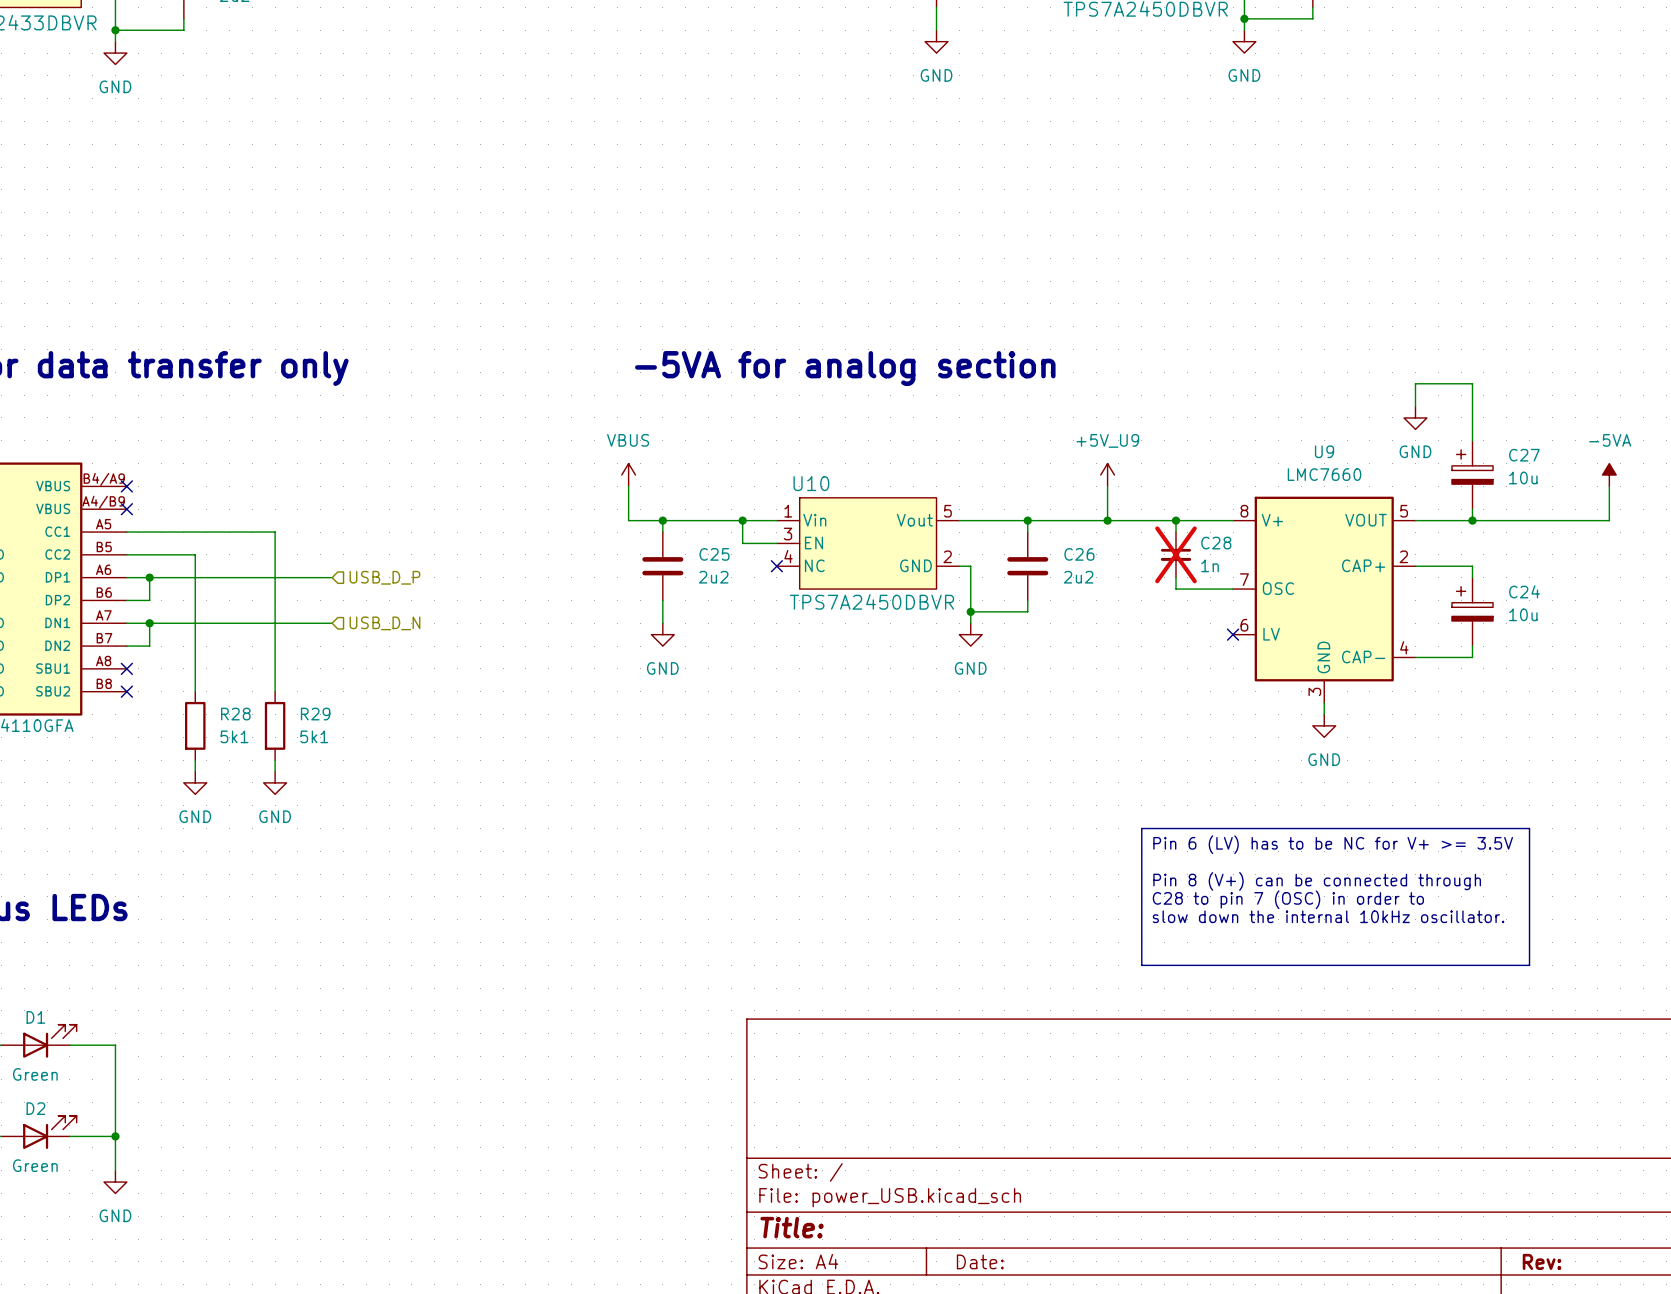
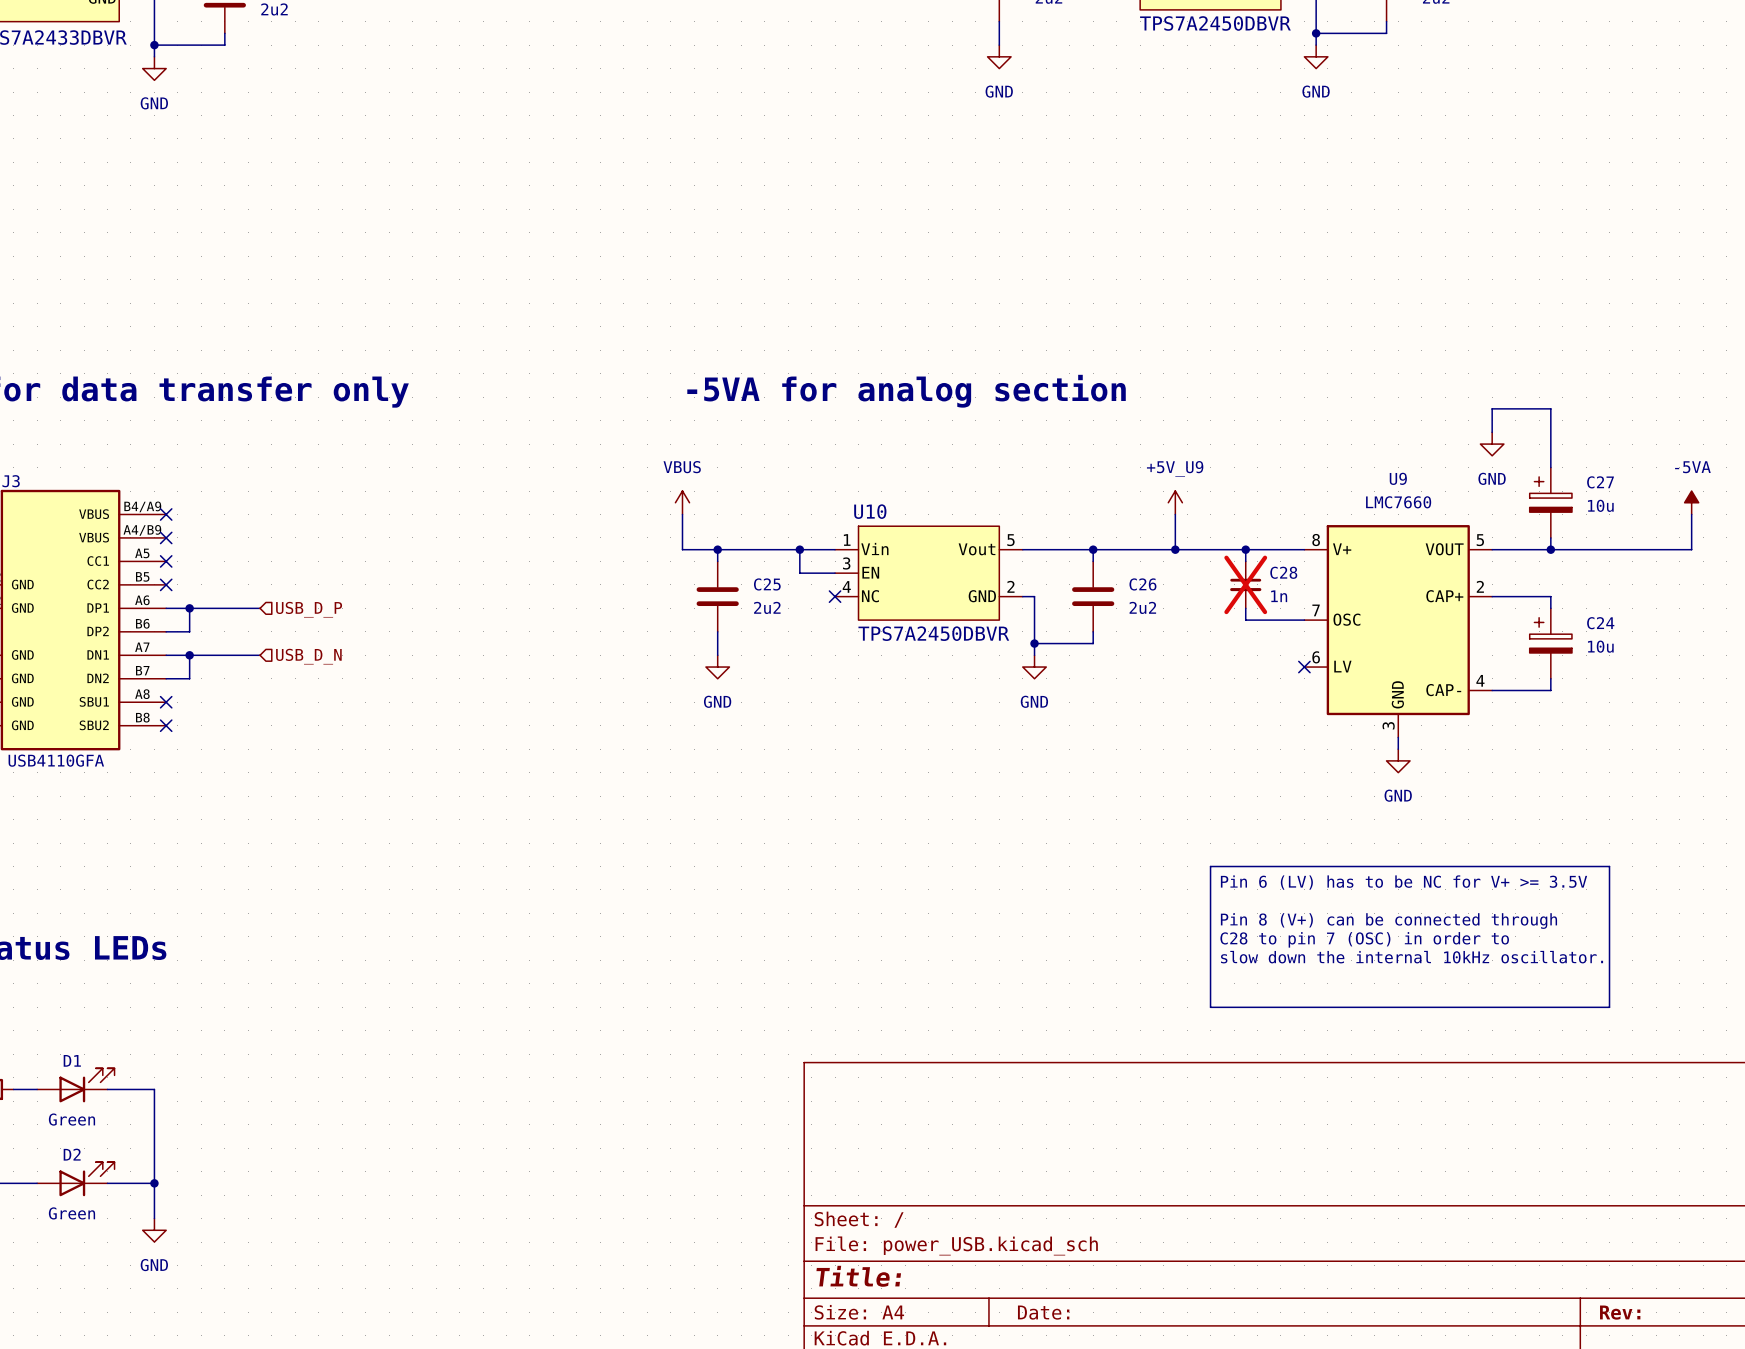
wire: (126, 532) (275, 532) (275, 691) -> none
no-connect mark: none -> (166, 561)
wire: (126, 554) (195, 554) (195, 691) -> none
no-connect mark: none -> (166, 584)
wire: (218, 577) (332, 577) -> none
hierarchical label position: USB_D_P (384, 577) -> USB_D_P (309, 609)
wire: (218, 623) (332, 623) -> none
hierarchical label position: USB_D_N (384, 623) -> USB_D_N (308, 656)
R28: 5k1 (195, 725) -> none
R29: 5k1 (275, 725) -> none
wire: (195, 760) (195, 771) -> none
wire: (275, 760) (275, 771) -> none
power symbol: GND (195, 782) -> none
power symbol: GND (275, 782) -> none

